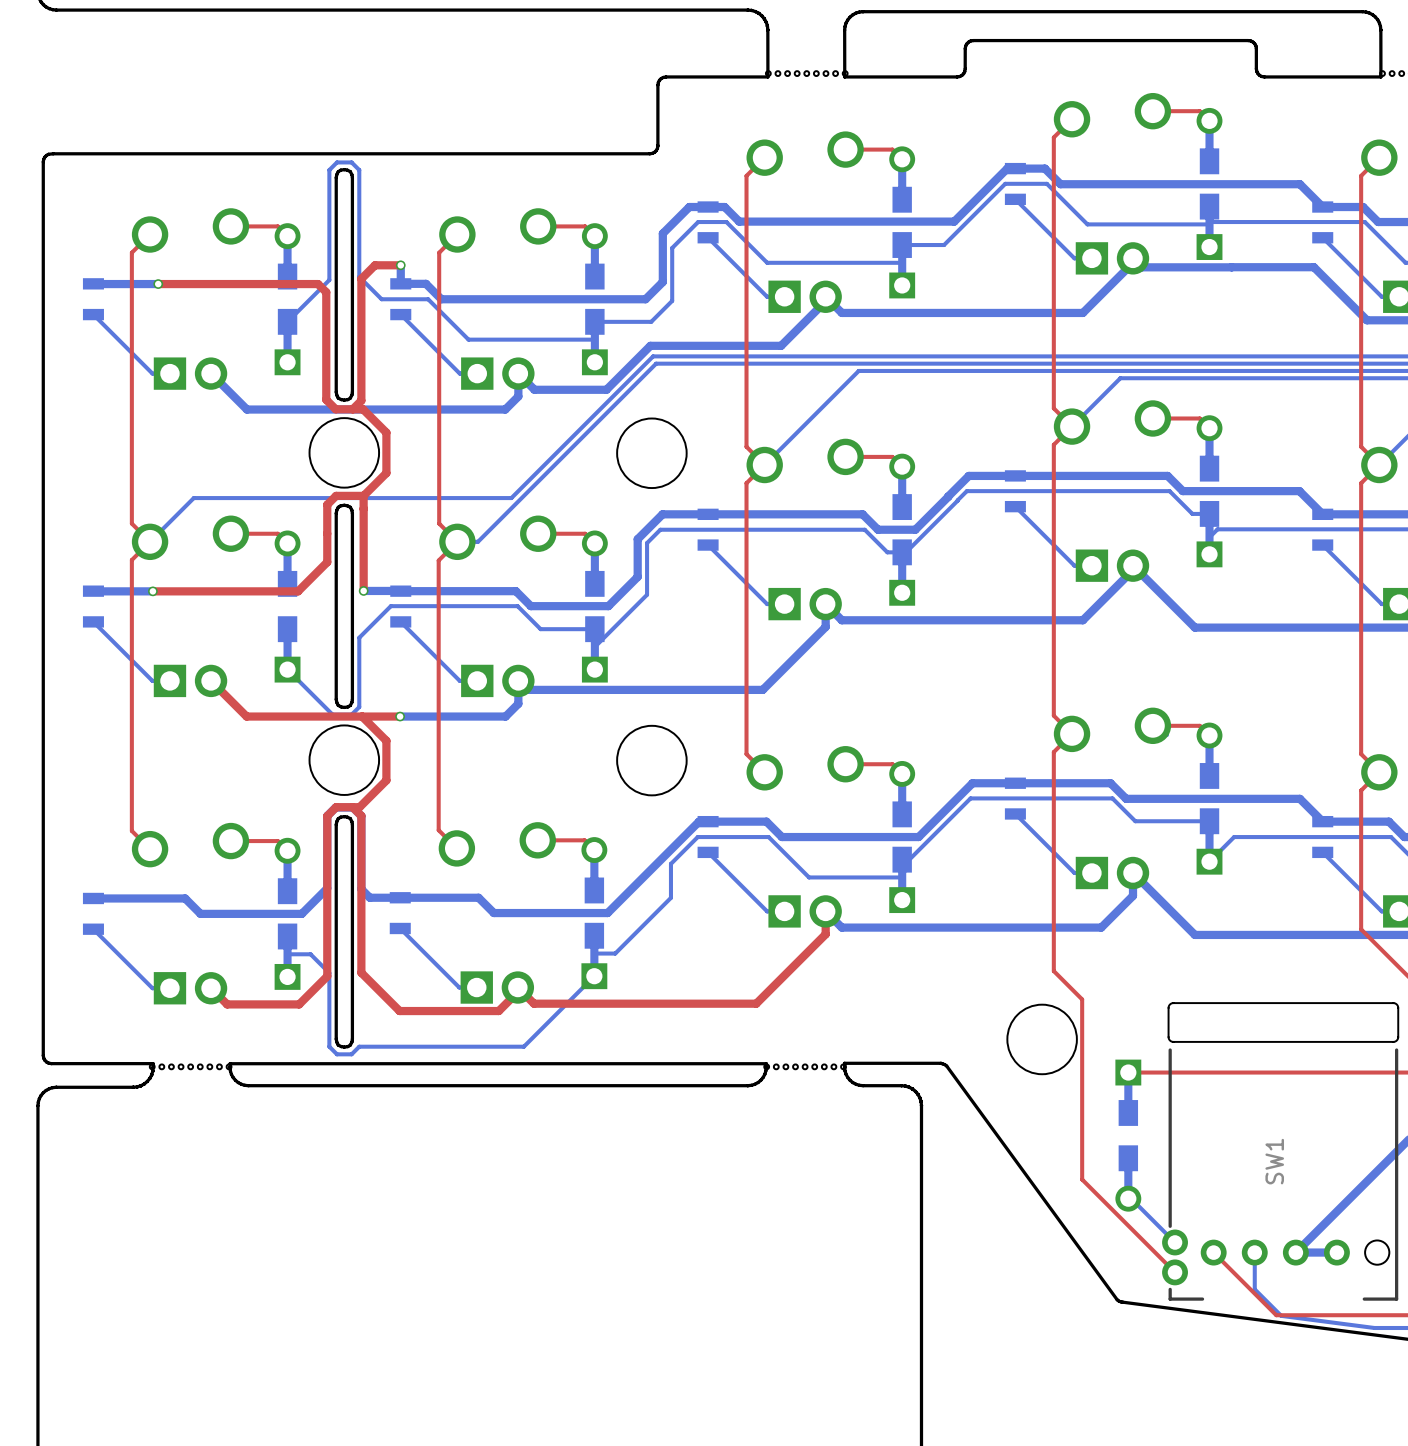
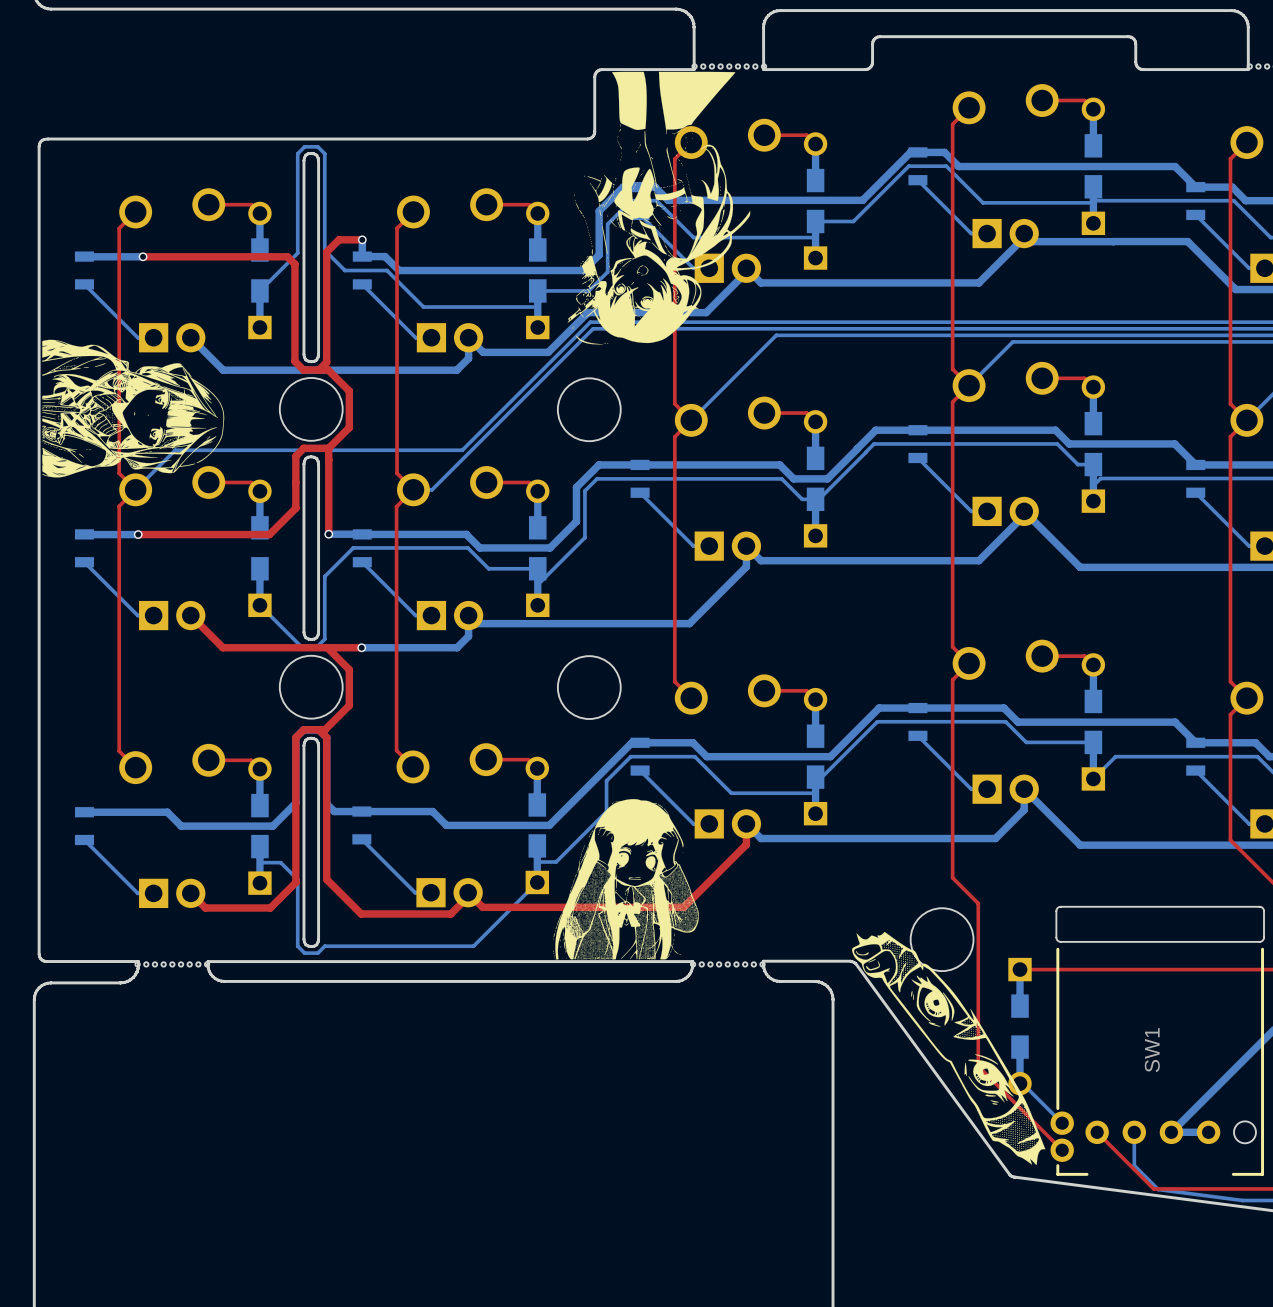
drawing: none -> [567, 71, 751, 345]
drawing: none -> [42, 339, 225, 478]
drawing: none -> [553, 799, 699, 960]
drawing: none -> [852, 931, 1046, 1166]

